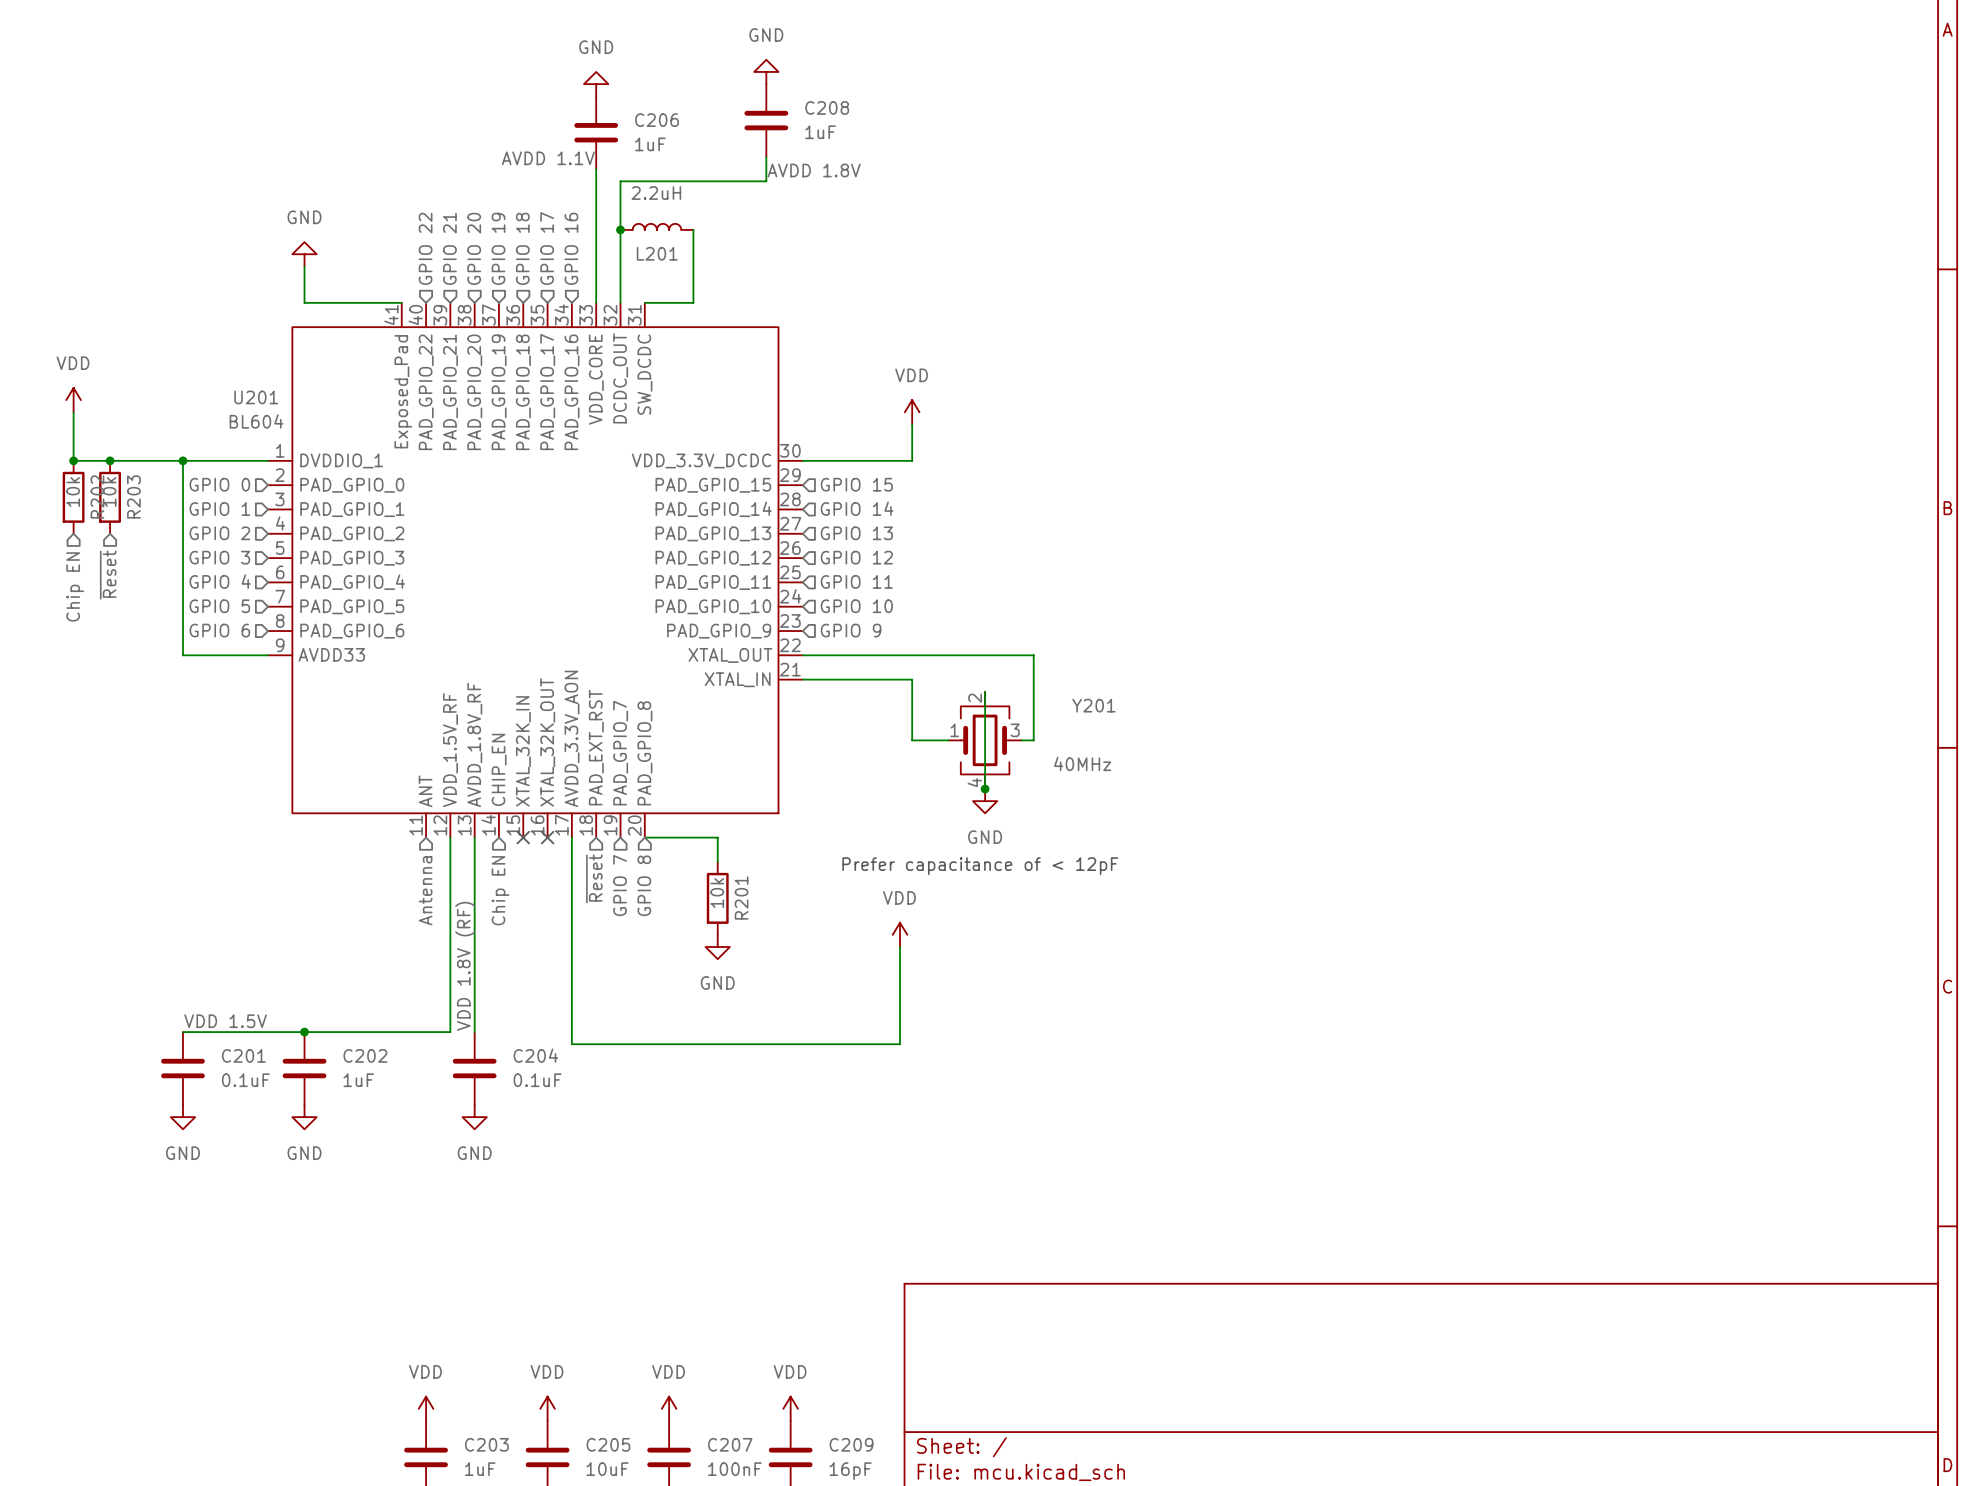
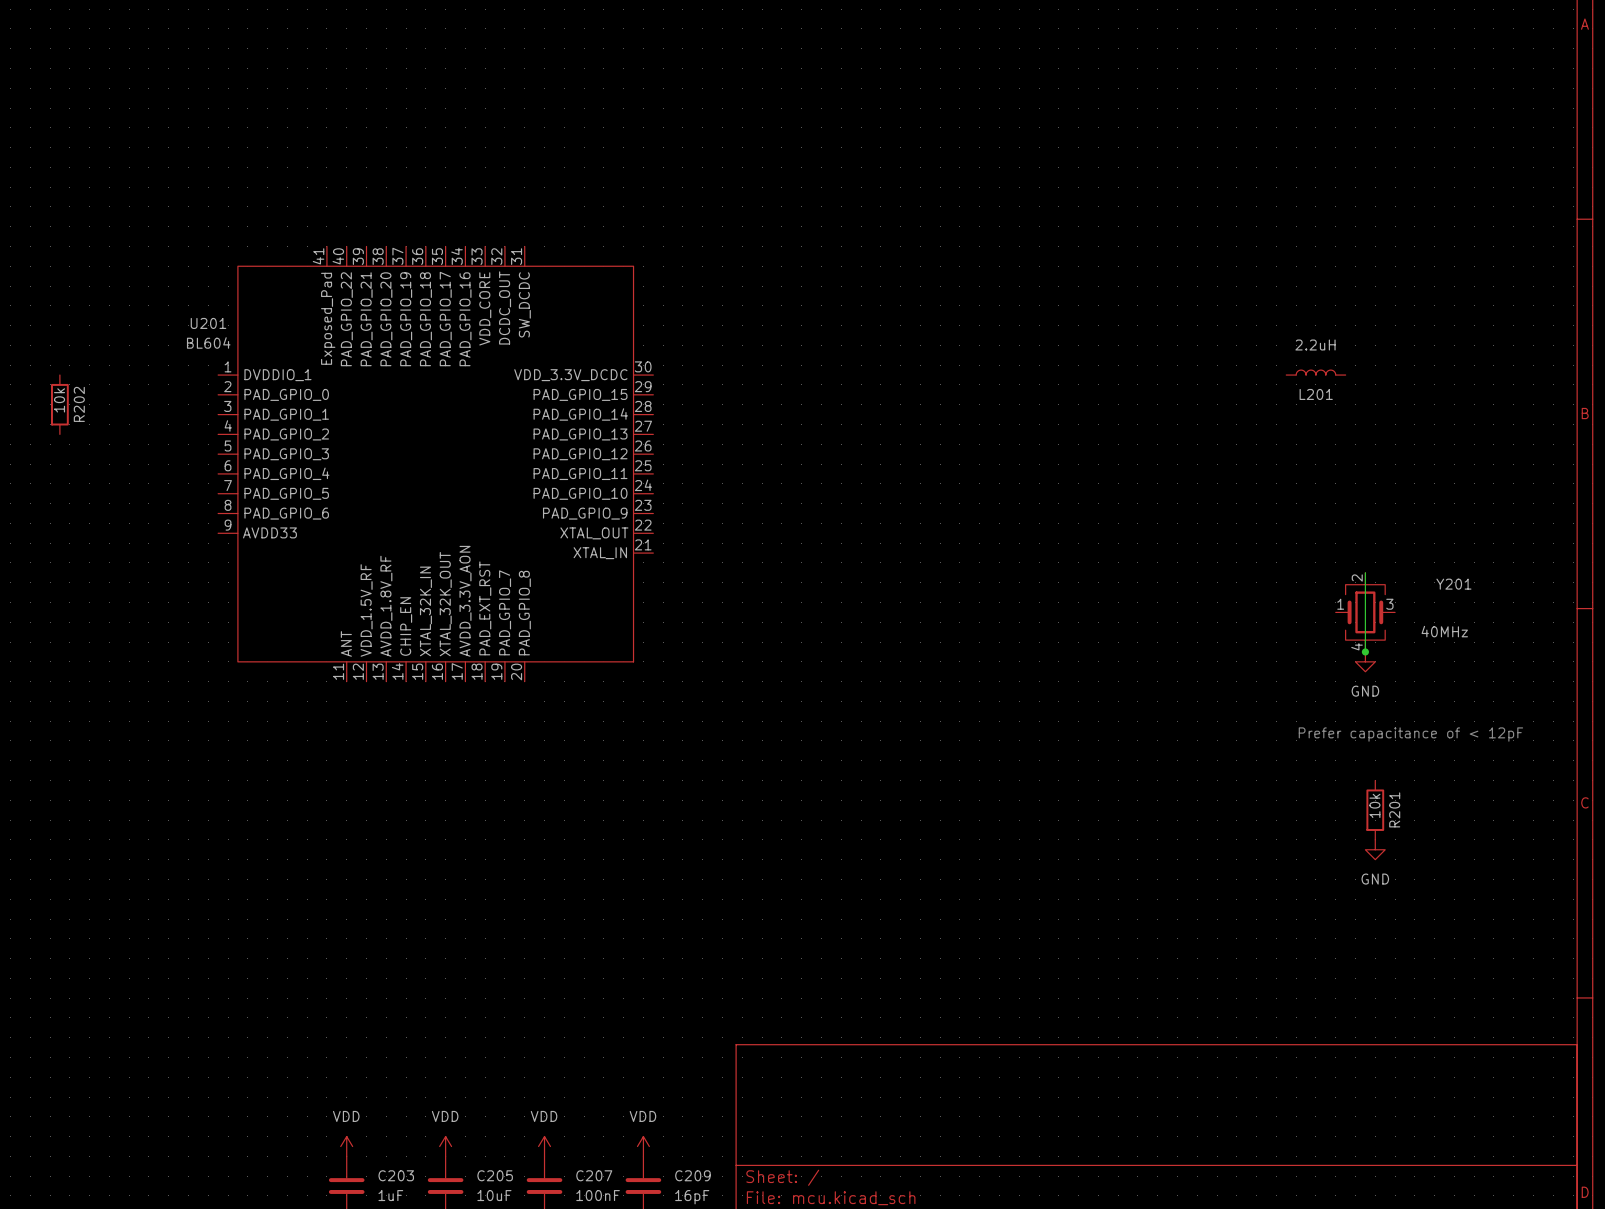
power symbol: GND (766, 71) -> none
power symbol: GND (596, 84) -> none
C208: 1uF (766, 120) -> none
C206: 1uF (596, 132) -> none
wire: (766, 157) (766, 181) (620, 181) (620, 302) -> none
label: AVDD 1.1V (548, 158) -> none
wire: (596, 169) (596, 302) -> none
label: AVDD 1.8V (814, 170) -> none
L201 position: (656, 226) -> (1315, 372)
junction: (620, 229) -> none
wire: (693, 229) (693, 302) (644, 302) -> none
hierarchical label: GPIO 22 (425, 248) -> none
hierarchical label: GPIO 21 (449, 248) -> none
hierarchical label: GPIO 20 (474, 248) -> none
hierarchical label: GPIO 19 (498, 248) -> none
hierarchical label: GPIO 18 (522, 248) -> none
hierarchical label: GPIO 17 (547, 248) -> none
hierarchical label: GPIO 16 (571, 248) -> none
power symbol: GND (304, 254) -> none
wire: (304, 266) (304, 302) (401, 302) -> none
power symbol: VDD (73, 400) -> none
wire: (73, 412) (73, 460) (268, 460) -> none
power symbol: VDD (912, 412) -> none
wire: (912, 424) (912, 460) (802, 460) -> none
junction: (73, 460) -> none
junction: (110, 460) -> none
wire: (182, 460) (182, 655) (268, 655) -> none
junction: (182, 460) -> none
hierarchical label: GPIO 0 (219, 484) -> none
hierarchical label: GPIO 15 (856, 484) -> none
R203: 10k (110, 497) -> none
hierarchical label: GPIO 14 (857, 508) -> none
hierarchical label: GPIO 1 (219, 509) -> none
hierarchical label: GPIO 2 (219, 533) -> none
hierarchical label: GPIO 13 (856, 533) -> none
hierarchical label: GPIO 3 (219, 557) -> none
hierarchical label: GPIO 12 (856, 557) -> none
hierarchical label: ~{Reset} (108, 575) -> none
hierarchical label: GPIO 4 (220, 581) -> none
hierarchical label: GPIO 11 (856, 581) -> none
hierarchical label: Chip EN (75, 586) -> none
hierarchical label: GPIO 5 (219, 606) -> none
hierarchical label: GPIO 10 (856, 606) -> none
hierarchical label: GPIO 6 (219, 630) -> none
hierarchical label: GPIO 9 (851, 630) -> none
wire: (802, 655) (1033, 655) (1033, 740) (1021, 740) -> none
wire: (802, 679) (912, 679) (912, 740) (948, 740) -> none
wire: (985, 691) (985, 789) -> none
wire: none -> (1365, 572) (1365, 651)
Y201 position: (985, 740) -> (1365, 612)
junction: (985, 789) -> none
power symbol: GND (985, 801) -> none
junction: none -> (1365, 651)
power symbol: none -> GND (1365, 661)
wire: (450, 837) (450, 1032) (182, 1032) -> none
wire: (474, 837) (474, 1032) -> none
no-connect mark: (523, 837) -> none
no-connect mark: (547, 837) -> none
wire: (571, 837) (571, 1044) (900, 1044) (900, 946) -> none
wire: (644, 837) (717, 837) (717, 861) -> none
text: Prefer capacitance of < 12pF (980, 866) -> none
hierarchical label: ~{Reset} (594, 878) -> none
hierarchical label: GPIO 7 (620, 885) -> none
hierarchical label: GPIO 8 (644, 885) -> none
hierarchical label: Antenna (425, 890) -> none
hierarchical label: Chip EN (500, 890) -> none
R201 position: (717, 898) -> (1375, 810)
text: none -> Prefer capacitance of < 12pF (1410, 734)
power symbol: VDD (900, 934) -> none
power symbol: GND (717, 946) -> none
label: VDD 1.8V (RF) (465, 966) -> none
label: VDD 1.5V (225, 1021) -> none
junction: (304, 1032) -> none
power symbol: none -> GND (1375, 849)
C201: 0.1uF (182, 1068) -> none
C202: 1uF (304, 1068) -> none
C204: 0.1uF (474, 1068) -> none
power symbol: GND (182, 1117) -> none
power symbol: GND (304, 1117) -> none
power symbol: GND (474, 1117) -> none

